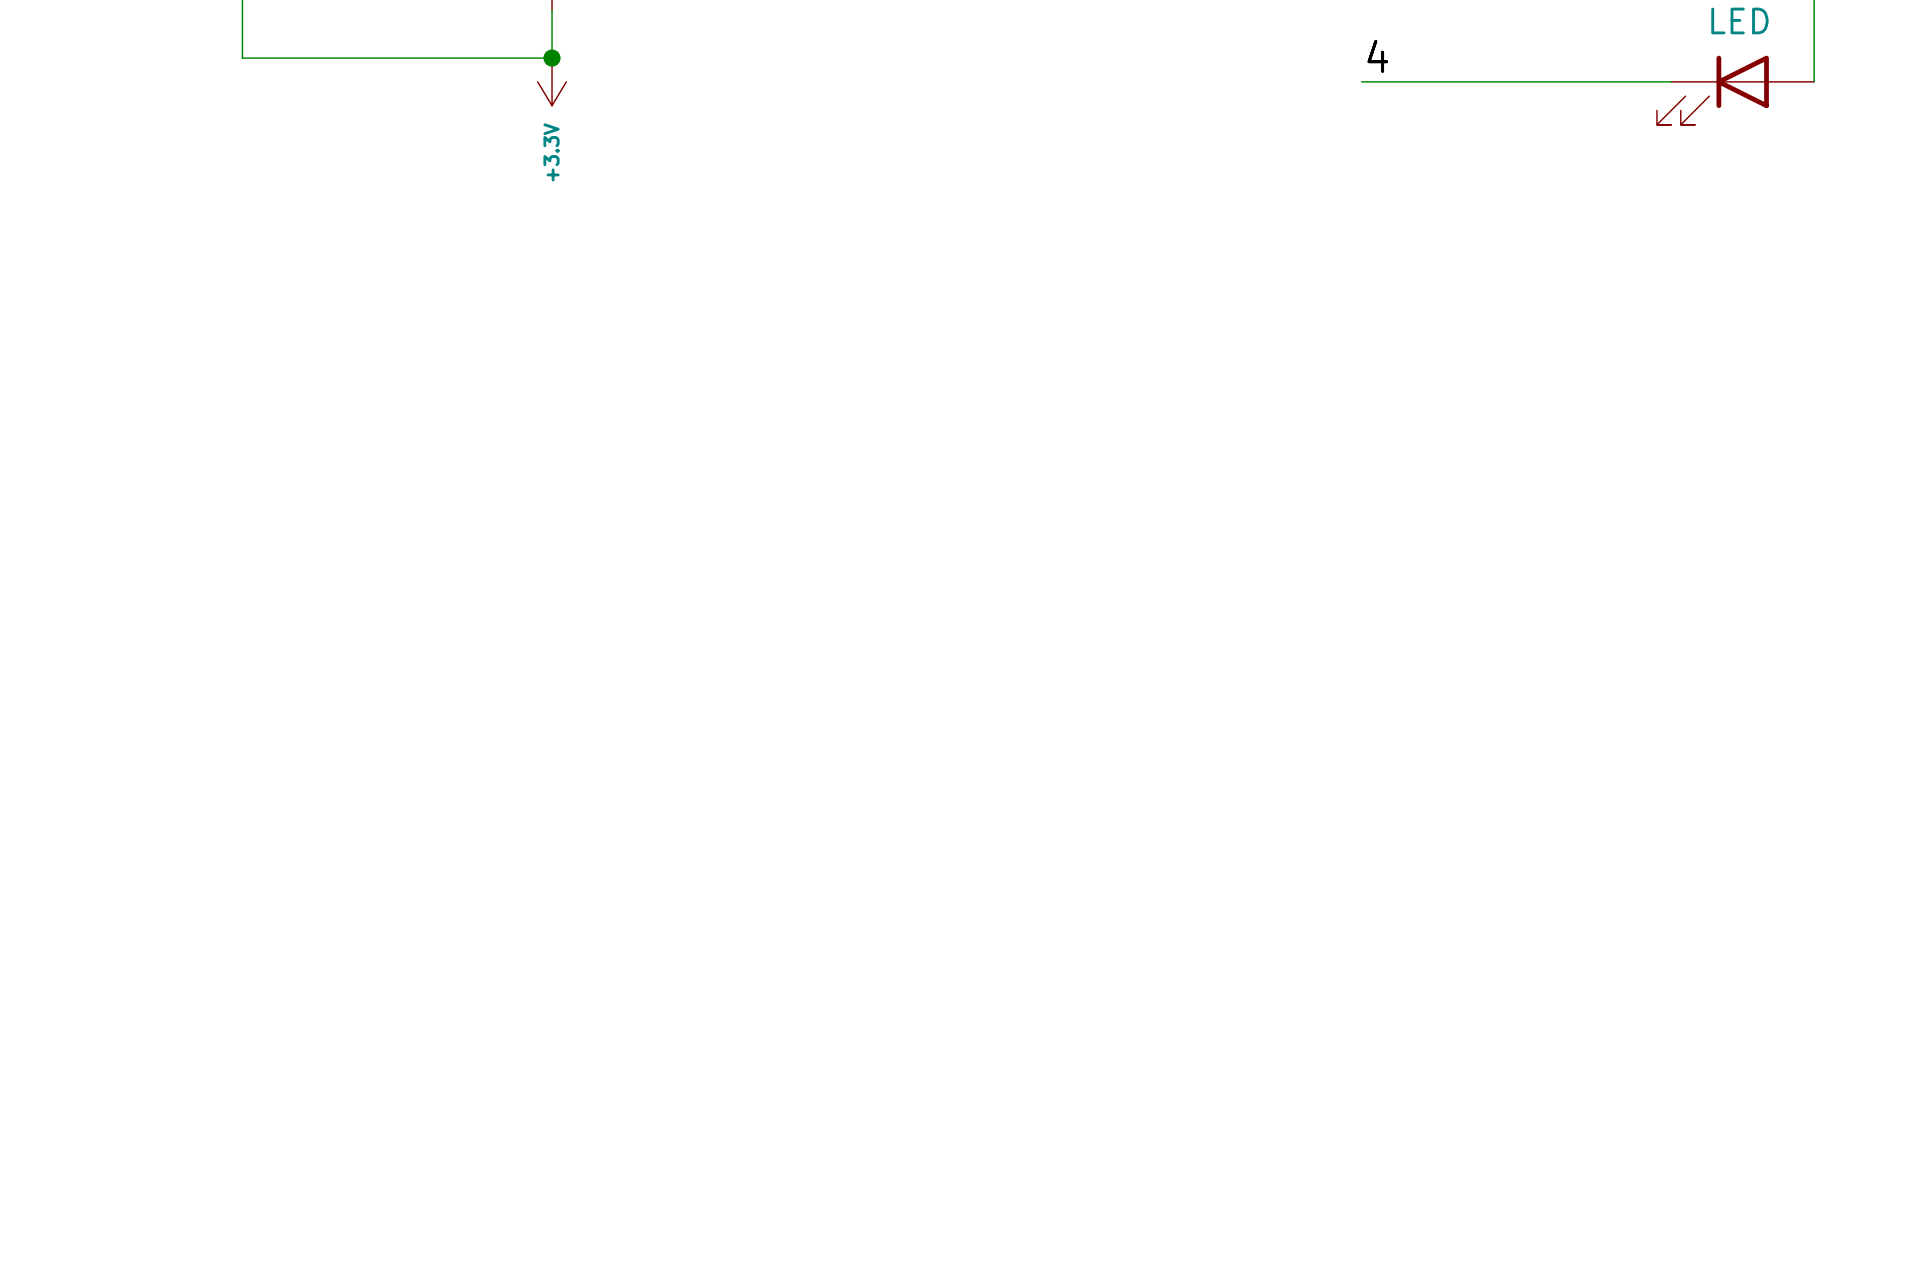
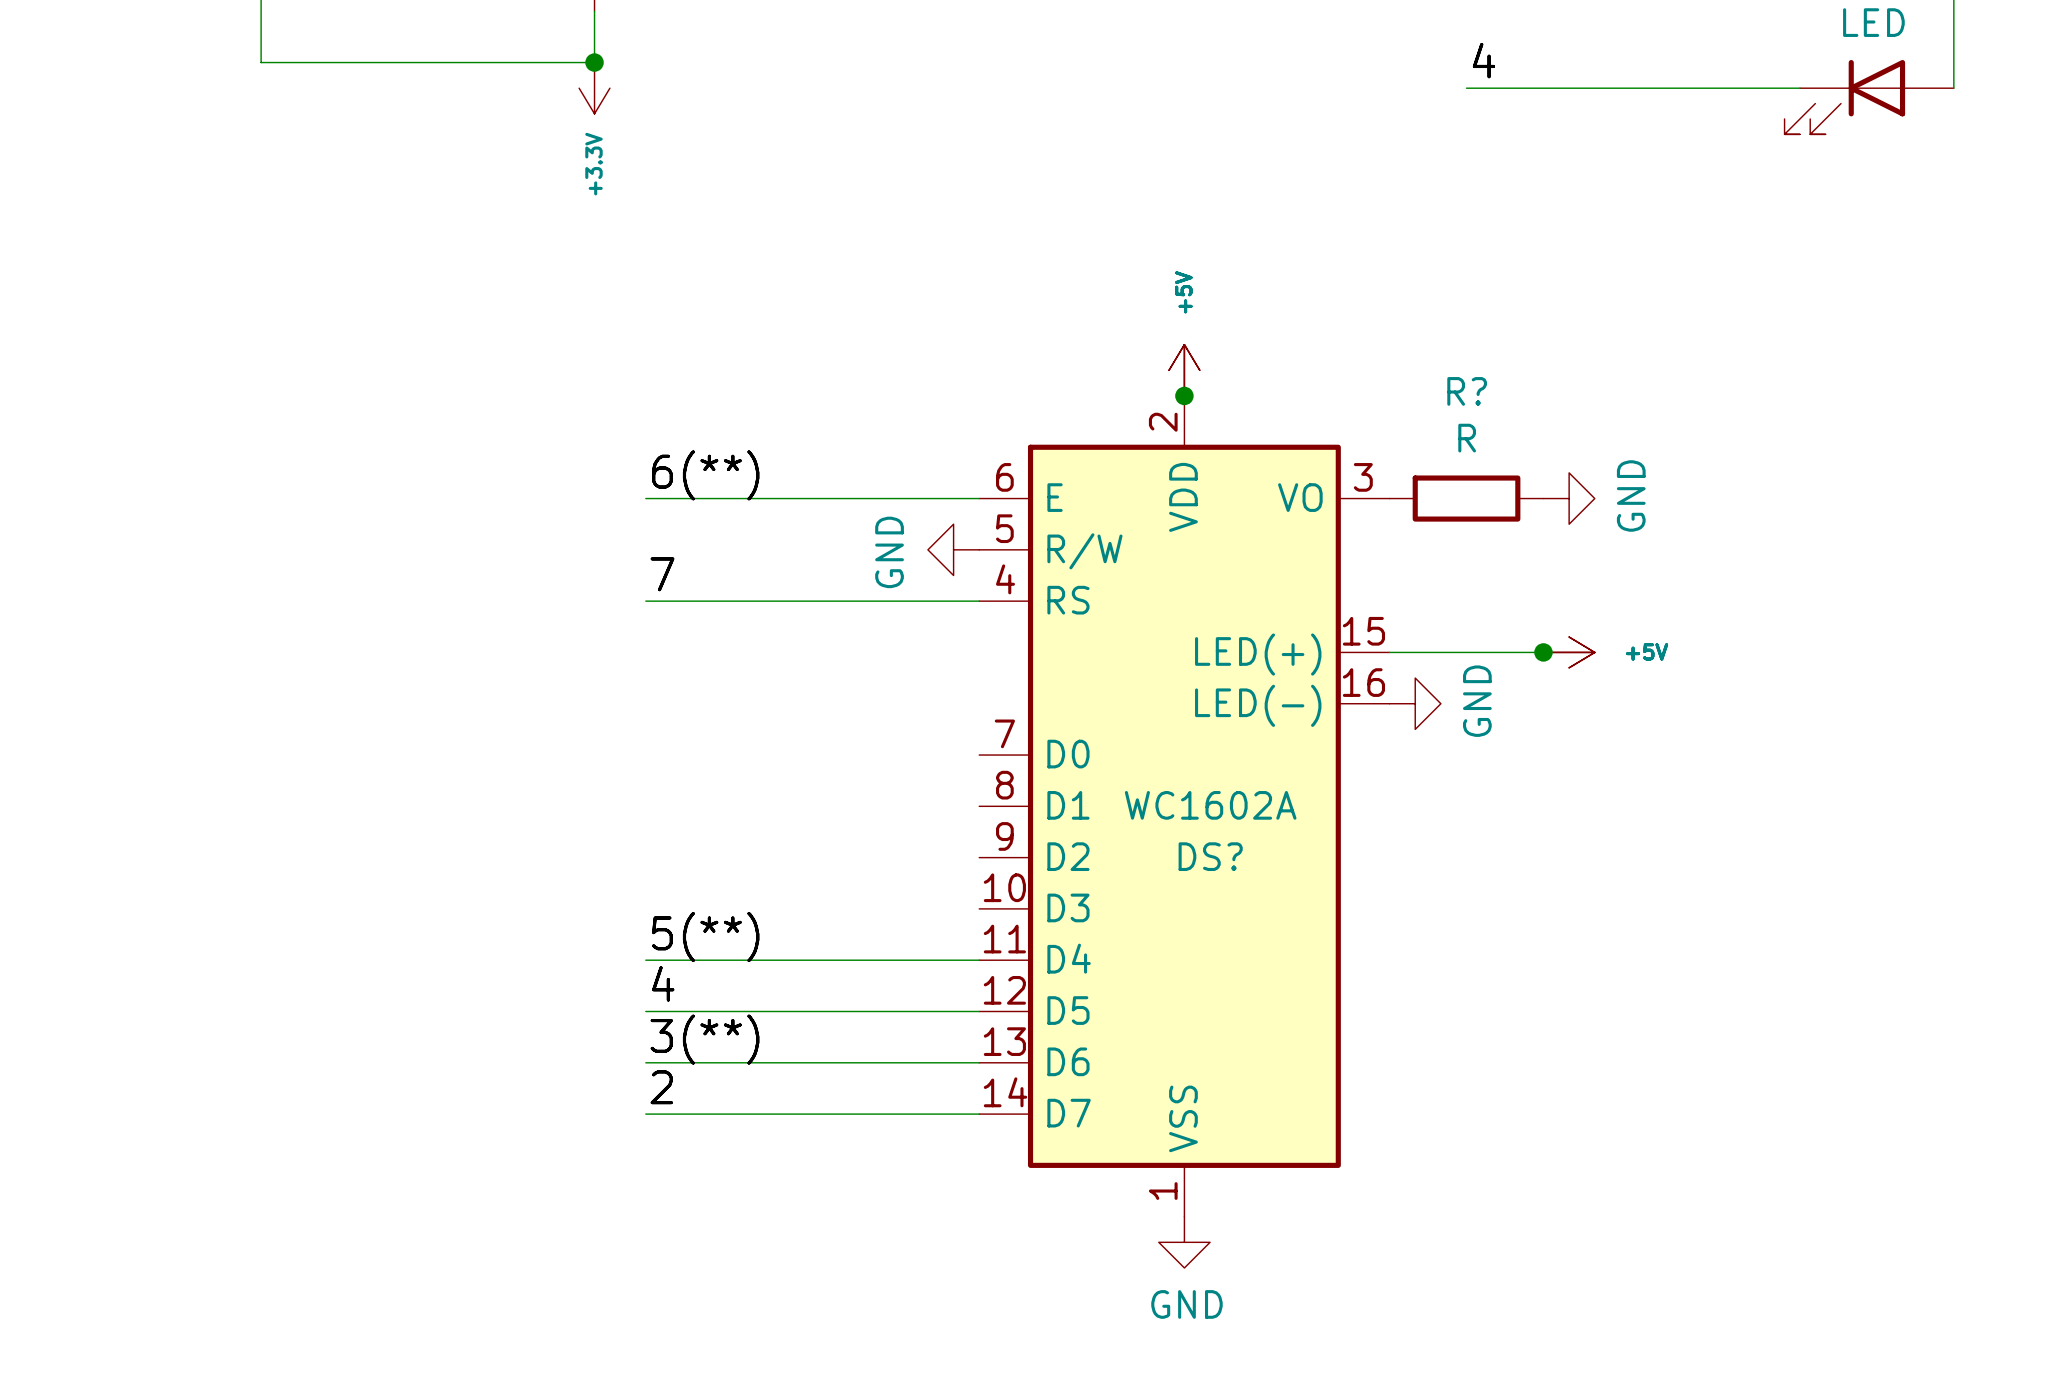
power symbol: none -> +5V (1184, 370)
junction: none -> (1184, 395)
label: none -> 6(**) (705, 475)
wire: none -> (645, 498) (979, 498)
R?: none -> R (1466, 498)
power symbol: none -> GND (1569, 498)
power symbol: none -> GND (953, 549)
label: none -> 7 (662, 574)
wire: none -> (645, 601) (979, 601)
wire: none -> (1389, 652) (1543, 652)
junction: none -> (1543, 652)
power symbol: none -> +5V (1569, 652)
power symbol: none -> GND (1415, 703)
DS?: none -> WC1602A (1184, 806)
label: none -> 5(**) (705, 937)
wire: none -> (645, 960) (979, 960)
label: none -> 4 (663, 983)
wire: none -> (645, 1011) (979, 1011)
label: none -> 3(**) (705, 1039)
wire: none -> (645, 1062) (979, 1062)
label: none -> 2 (661, 1087)
wire: none -> (645, 1114) (979, 1114)
power symbol: none -> GND (1184, 1242)

